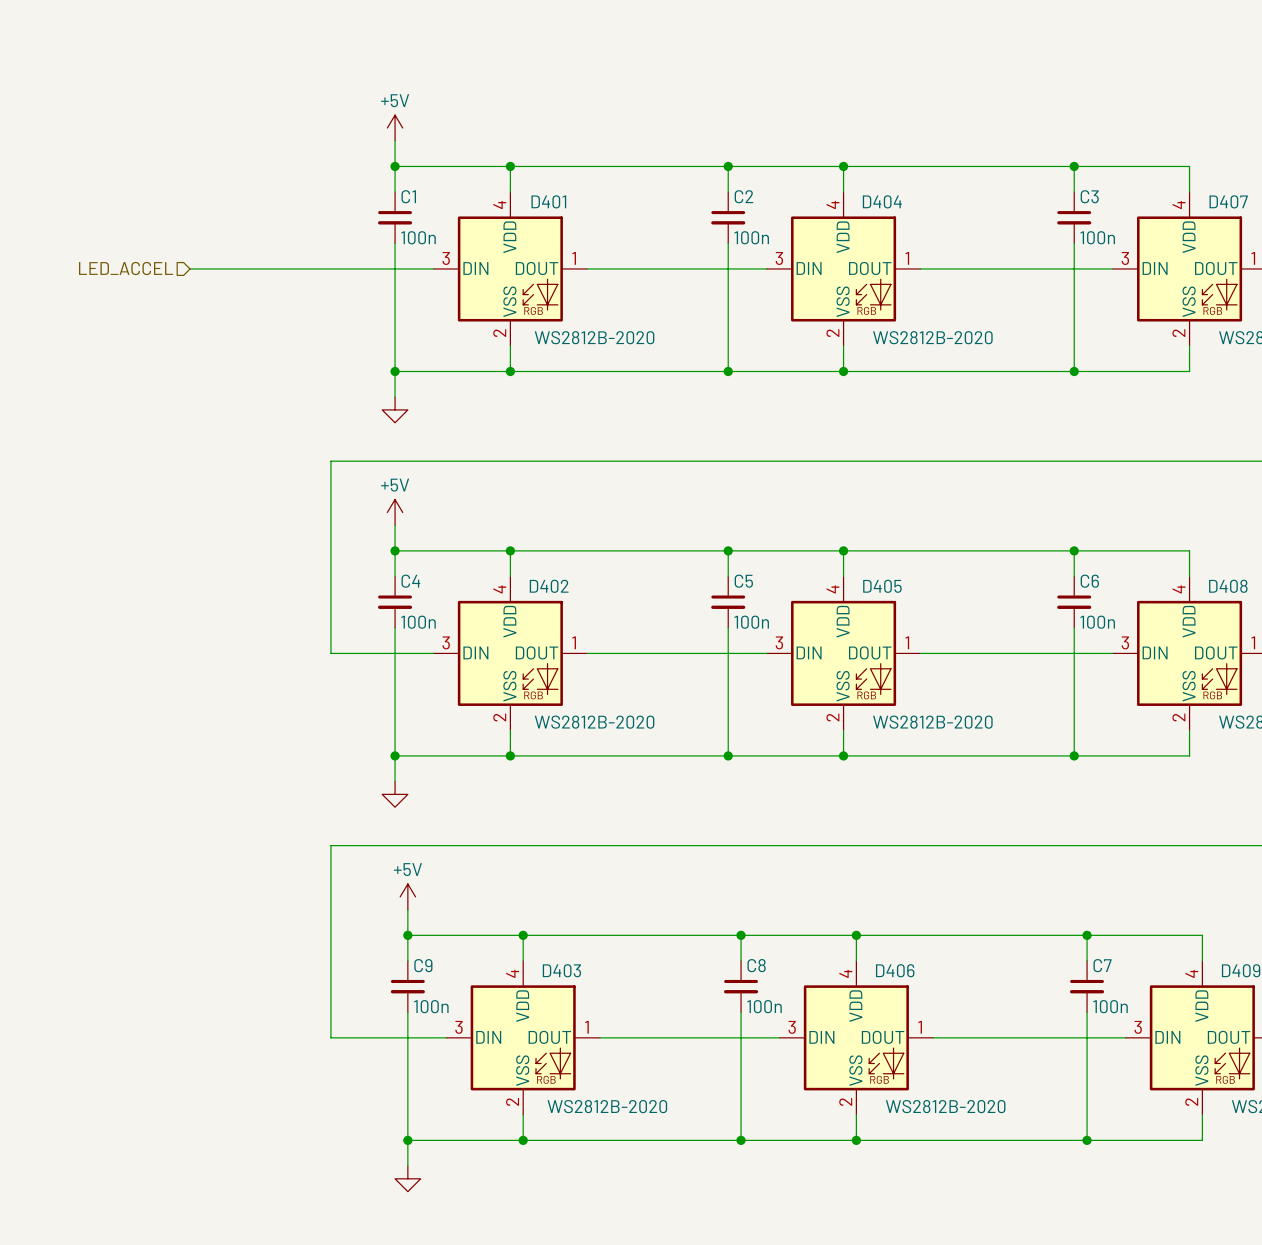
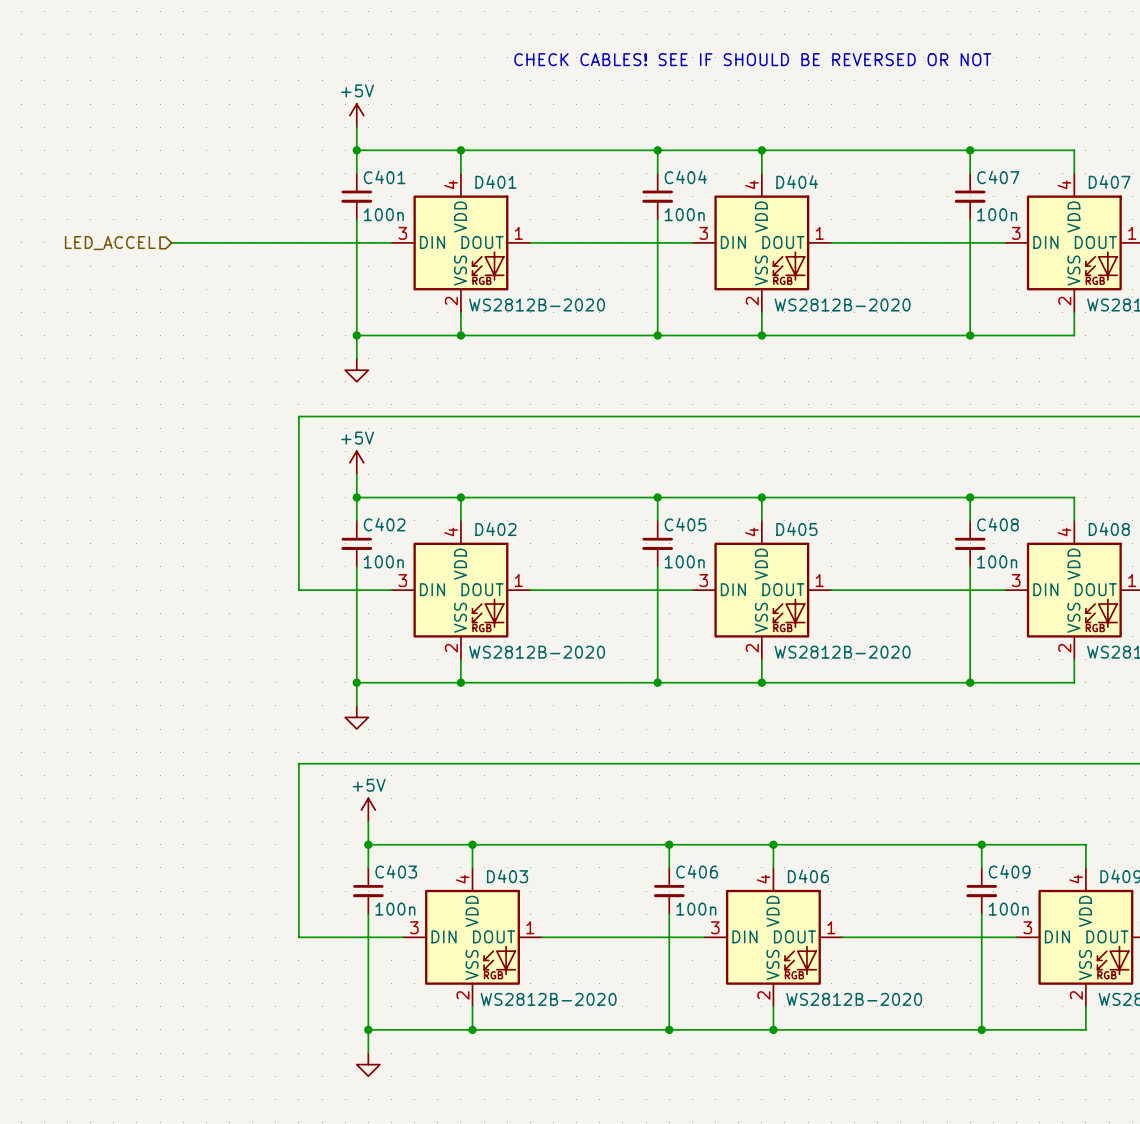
text: none -> CHECK CABLES! SEE IF SHOULD BE REVERSED OR NOT (752, 59)
C1 name: C1 (408, 196) -> C401 (384, 177)
C2 name: C2 (743, 196) -> C404 (685, 177)
C3 name: C3 (1089, 196) -> C407 (998, 177)
C4 name: C4 (410, 581) -> C402 (384, 524)
C5 name: C5 (743, 581) -> C405 (685, 524)
C6 name: C6 (1089, 581) -> C408 (998, 524)
C9 name: C9 (423, 965) -> C403 (396, 871)
C8 name: C8 (756, 965) -> C406 (697, 871)
C7 name: C7 (1102, 965) -> C409 (1009, 871)

